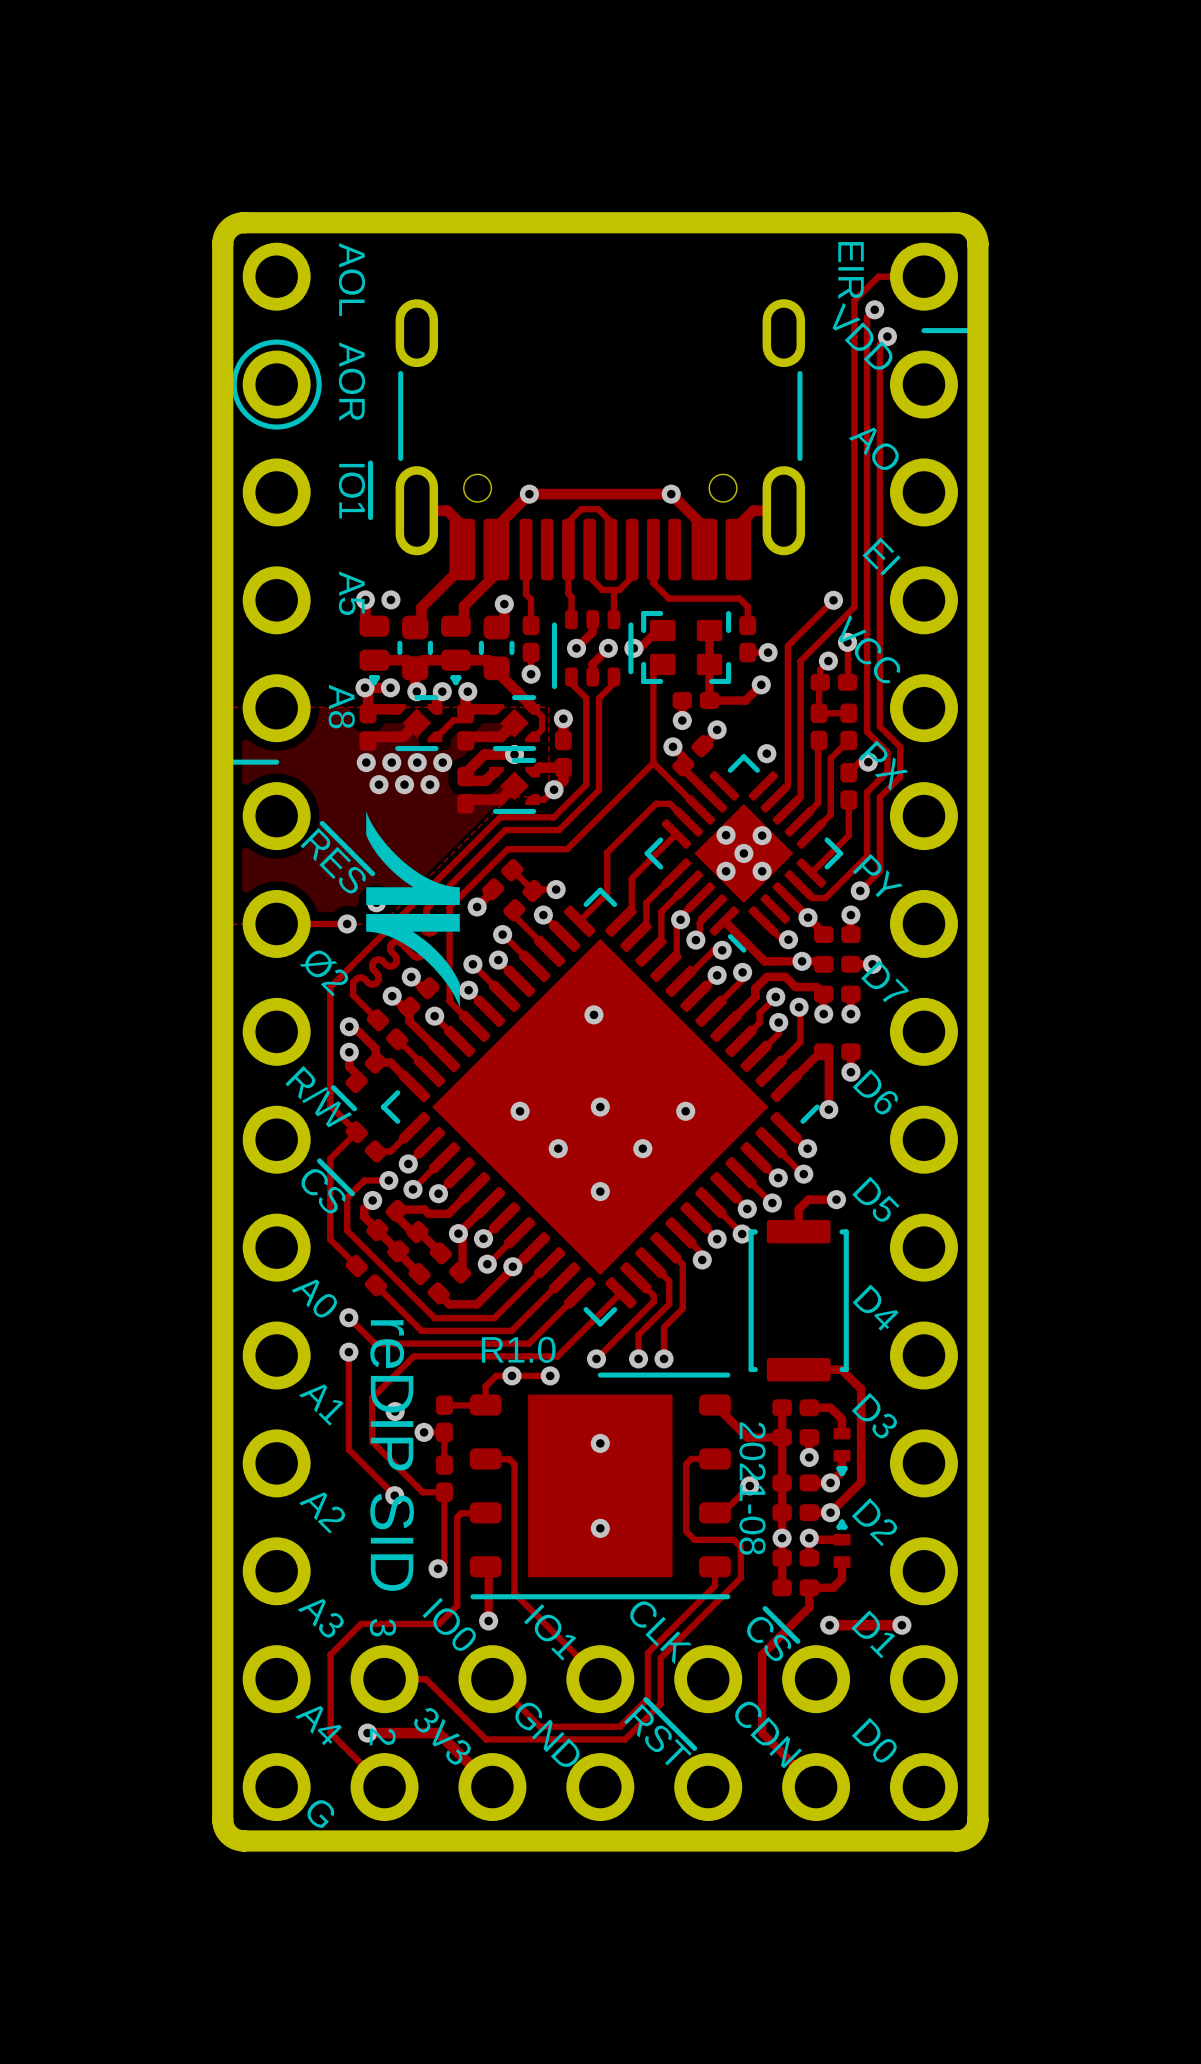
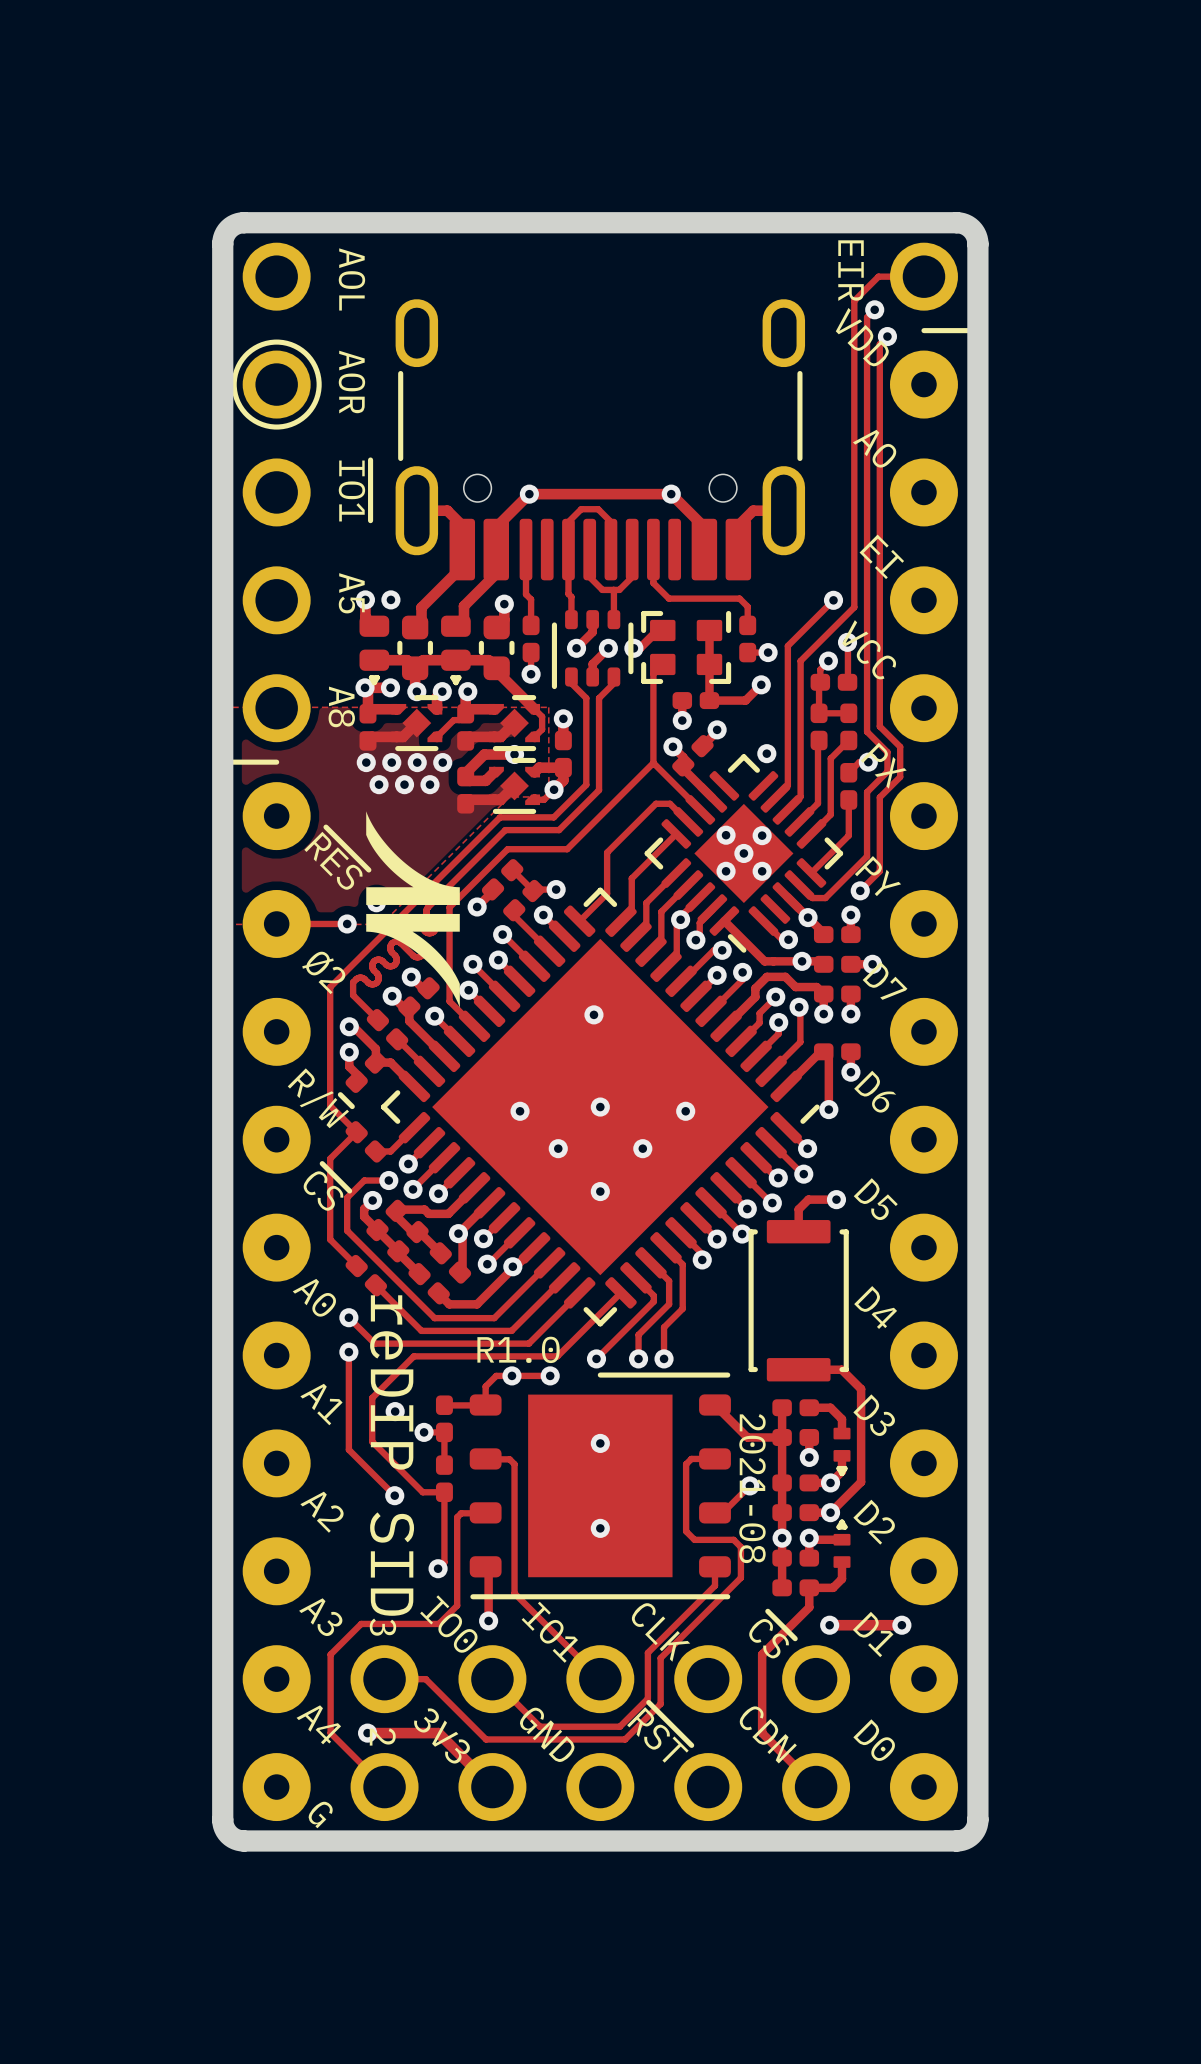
part footprint: [890, 350, 958, 1822] -> [890, 350, 958, 1822]
part footprint: [242, 782, 311, 1822] -> [242, 782, 311, 1822]

